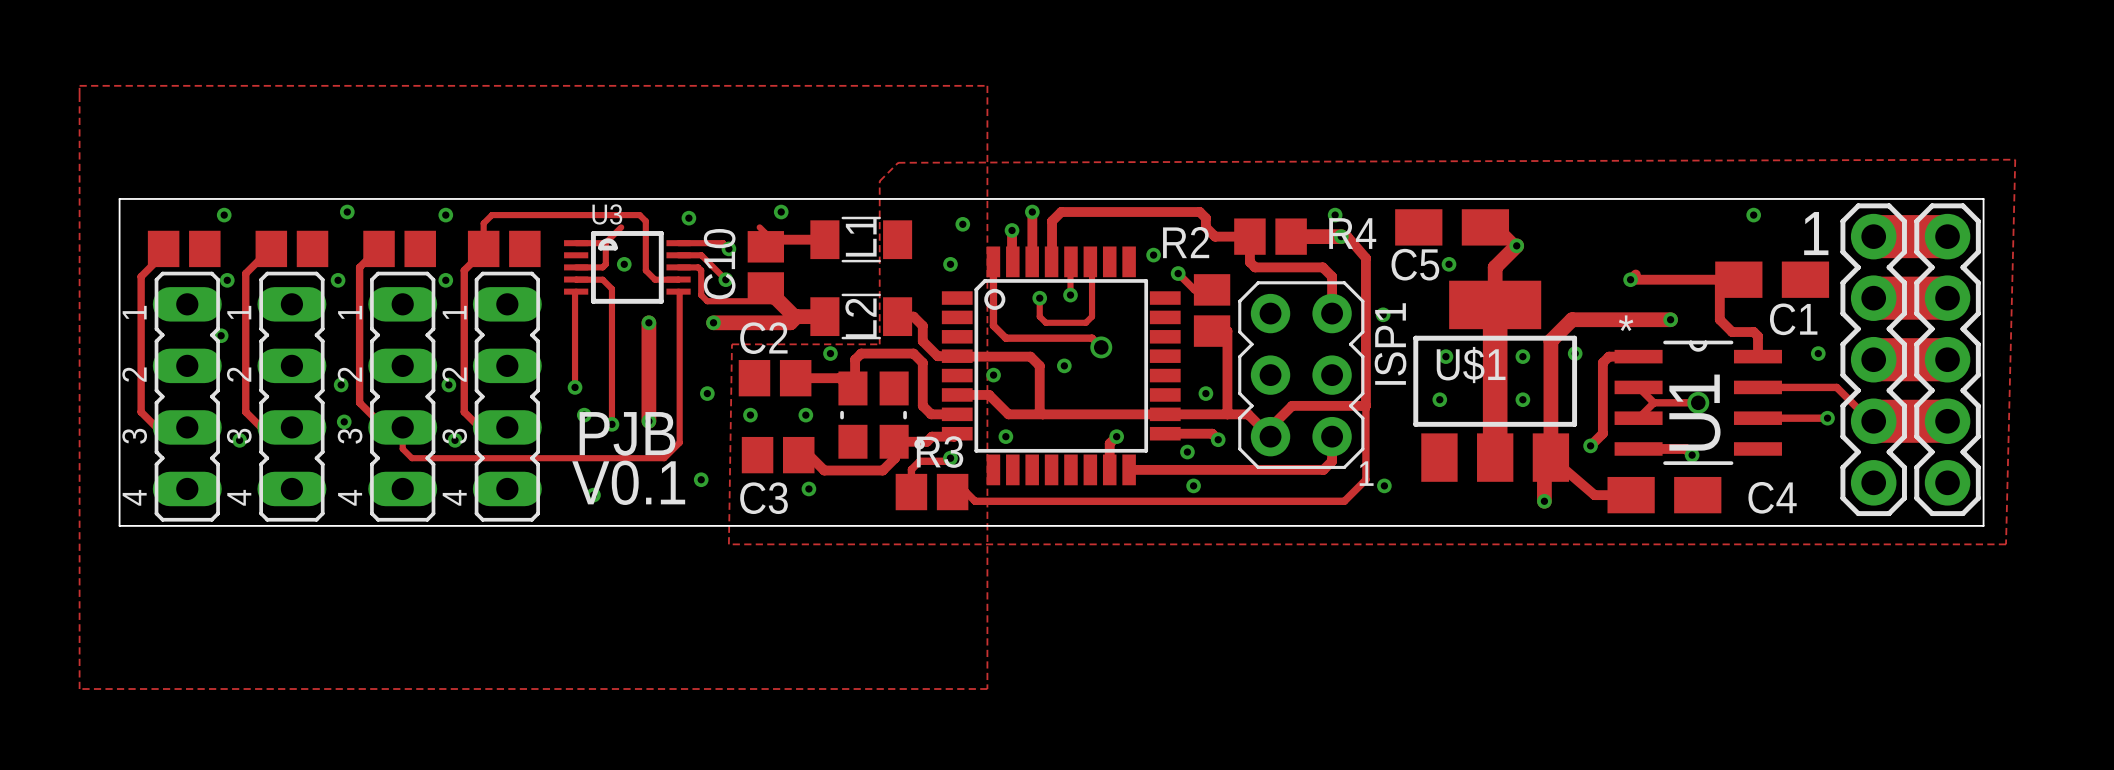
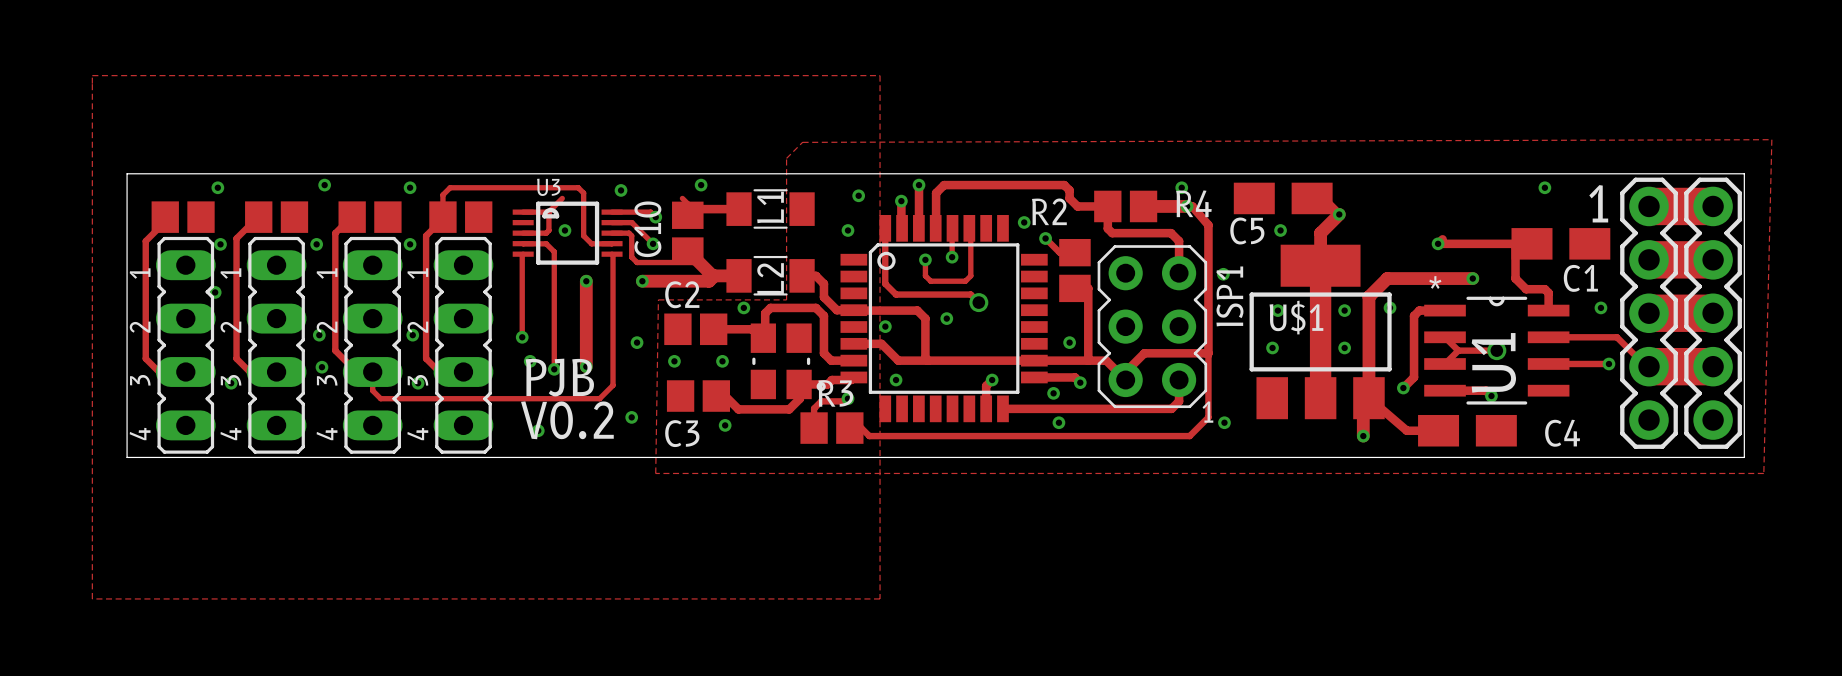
text: V0.1 (628, 482) -> V0.2 (567, 420)

